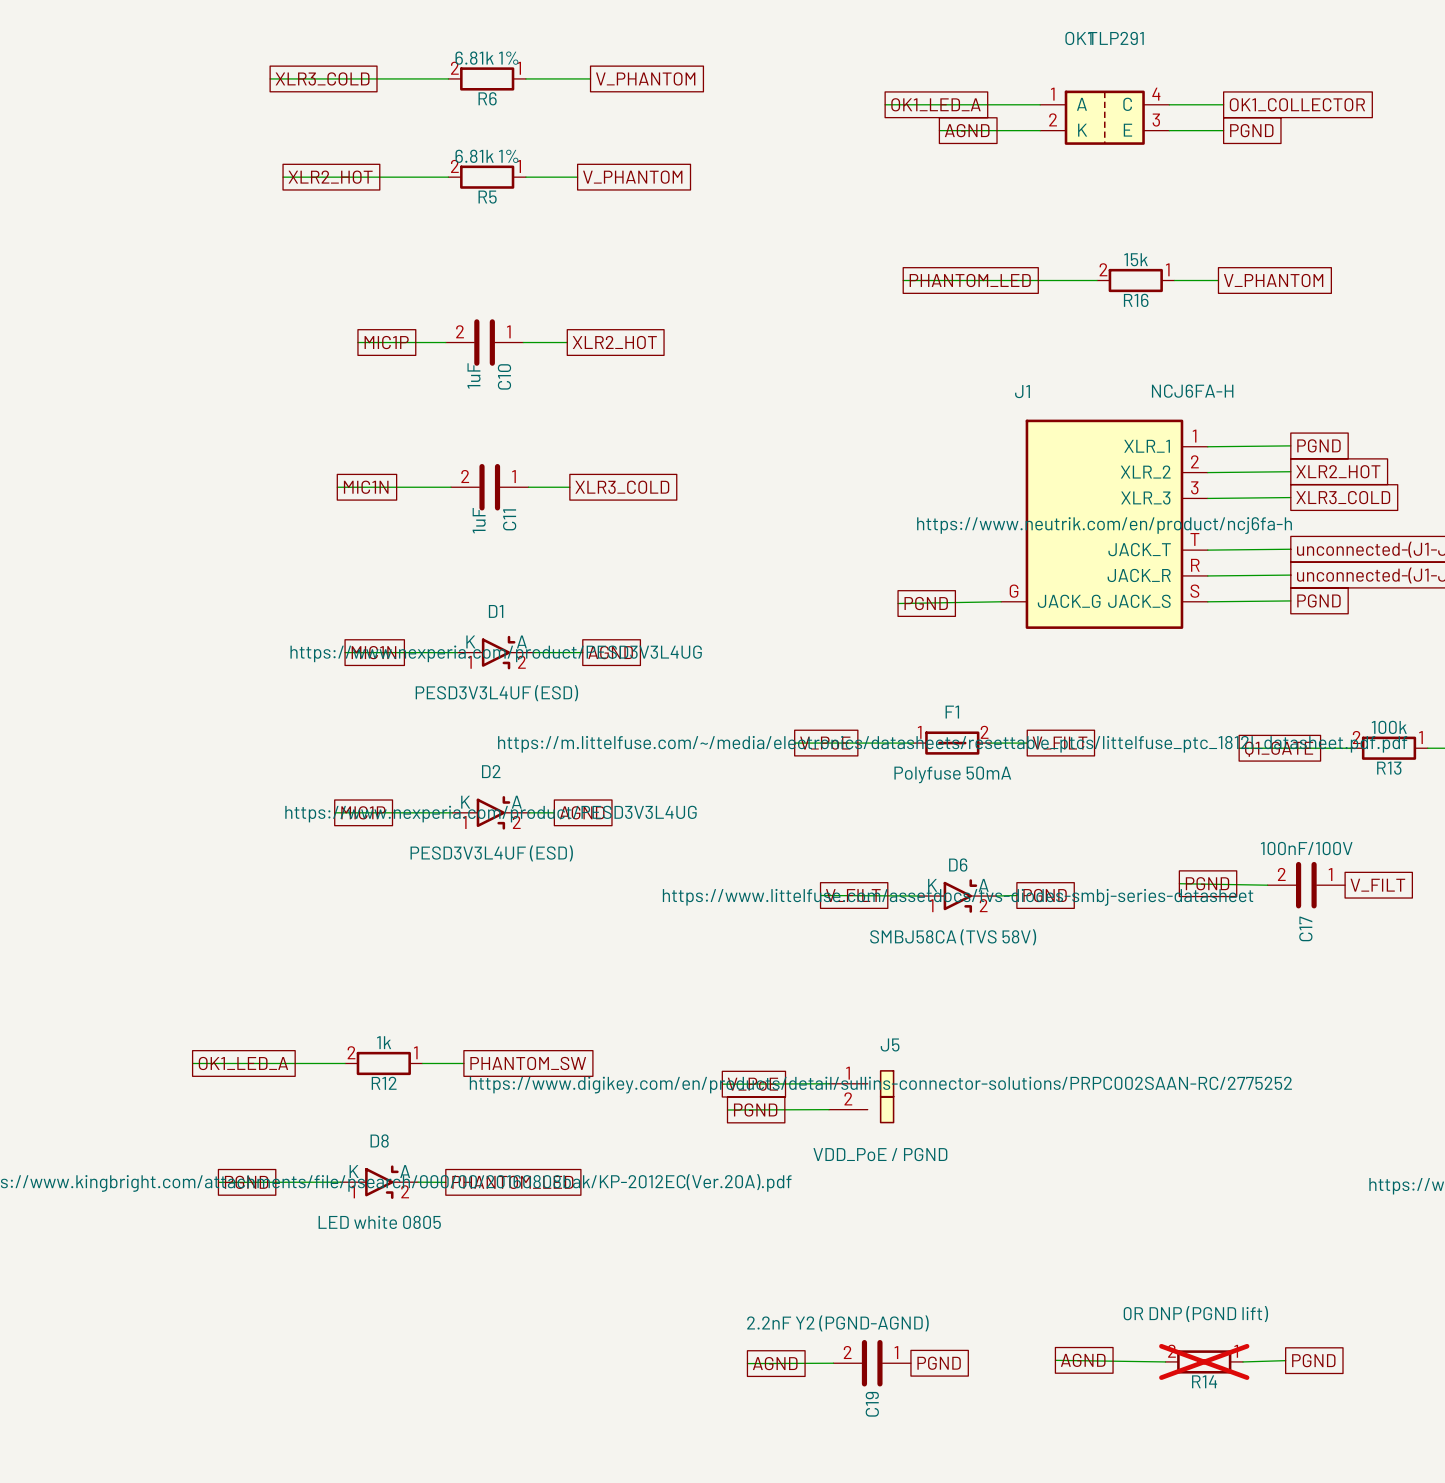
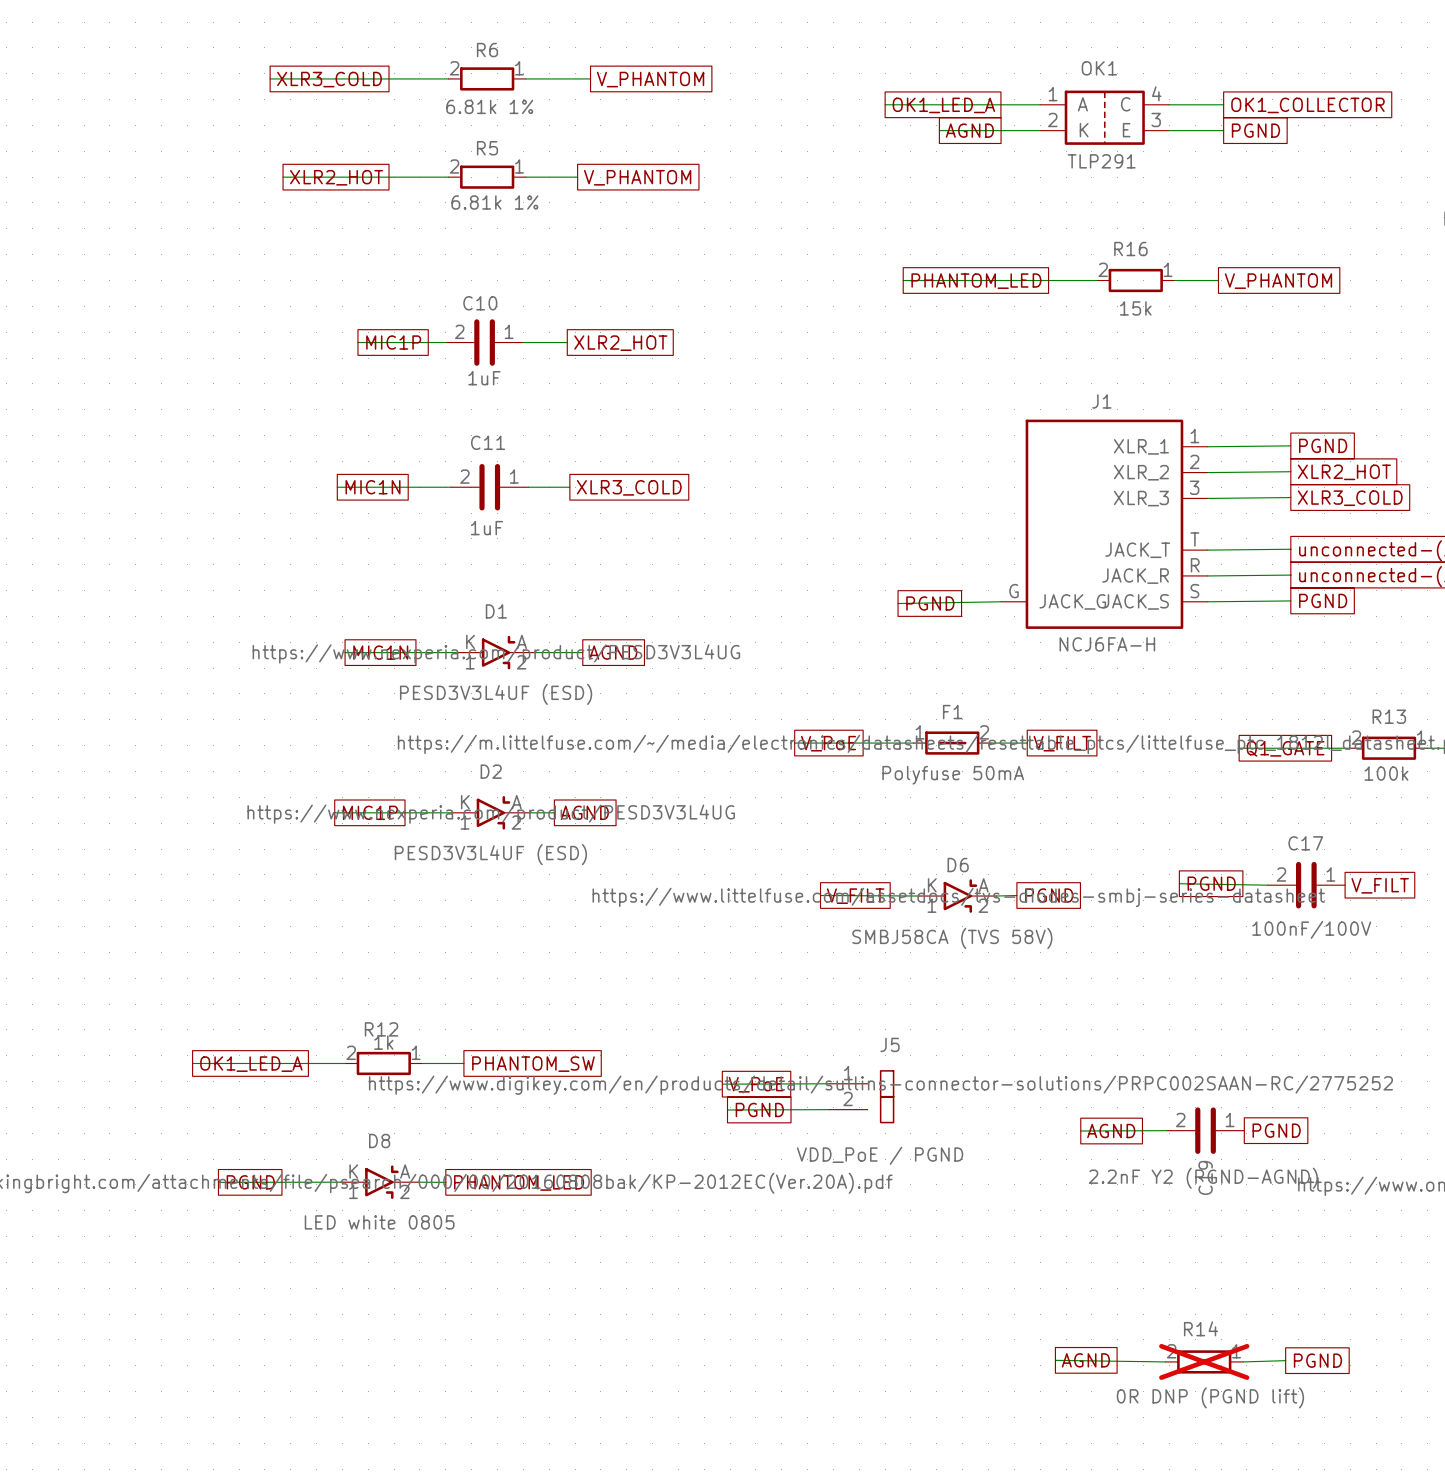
OK1 name position: OK1 (1078, 38) -> OK1 (1099, 68)
OK1 value position: TLP291 (1116, 38) -> TLP291 (1101, 161)
R6 value position: 6.81k 1% (486, 58) -> 6.81k 1% (489, 106)
R6 name position: R6 (487, 98) -> R6 (487, 50)
R5 value position: 6.81k 1% (486, 156) -> 6.81k 1% (494, 202)
R5 name position: R5 (487, 197) -> R5 (487, 148)
R16 value position: 15k (1136, 259) -> 15k (1135, 308)
R16 name position: R16 (1136, 300) -> R16 (1130, 249)
C10 value rotation: 0° (474, 375) -> 90° clockwise (484, 378)
C10 name rotation: 0° (504, 376) -> 90° clockwise (480, 303)
C10 name position: C10 (504, 376) -> C10 (480, 303)
J1 name position: J1 (1022, 391) -> J1 (1101, 401)
J1 value position: NCJ6FA-H (1192, 391) -> NCJ6FA-H (1107, 644)
C11 name rotation: 0° (509, 519) -> 90° clockwise (488, 442)
C11 name position: C11 (509, 519) -> C11 (488, 442)
C11 value rotation: 0° (479, 520) -> 90° clockwise (487, 528)
J1 text: https://www.neutrik.com/en/product/ncj6fa-h (1104, 525) -> none
R13 value position: 100k (1389, 727) -> 100k (1386, 773)
R13 name position: R13 (1389, 768) -> R13 (1389, 716)
C17 value position: 100nF/100V (1306, 848) -> 100nF/100V (1311, 929)
C17 name rotation: 0° (1305, 928) -> 90° clockwise (1305, 843)
C17 name position: C17 (1305, 928) -> C17 (1305, 843)
R12 name position: R12 (384, 1083) -> R12 (381, 1029)
wire: none -> (1166, 1130) (1080, 1131)
global label: none -> PGND (1276, 1130)
global label: none -> AGND (1111, 1131)
R14 value position: 0R DNP (PGND lift) (1195, 1314) -> 0R DNP (PGND lift) (1210, 1397)
C19 value position: 2.2nF Y2 (PGND-AGND) (837, 1323) -> 2.2nF Y2 (PGND-AGND) (1203, 1178)
global label: AGND (775, 1363) -> none
wire: (833, 1363) (747, 1363) -> none
C19 position: (872, 1363) -> (1205, 1130)
global label: PGND (939, 1363) -> none
R14 name position: R14 (1204, 1381) -> R14 (1200, 1328)

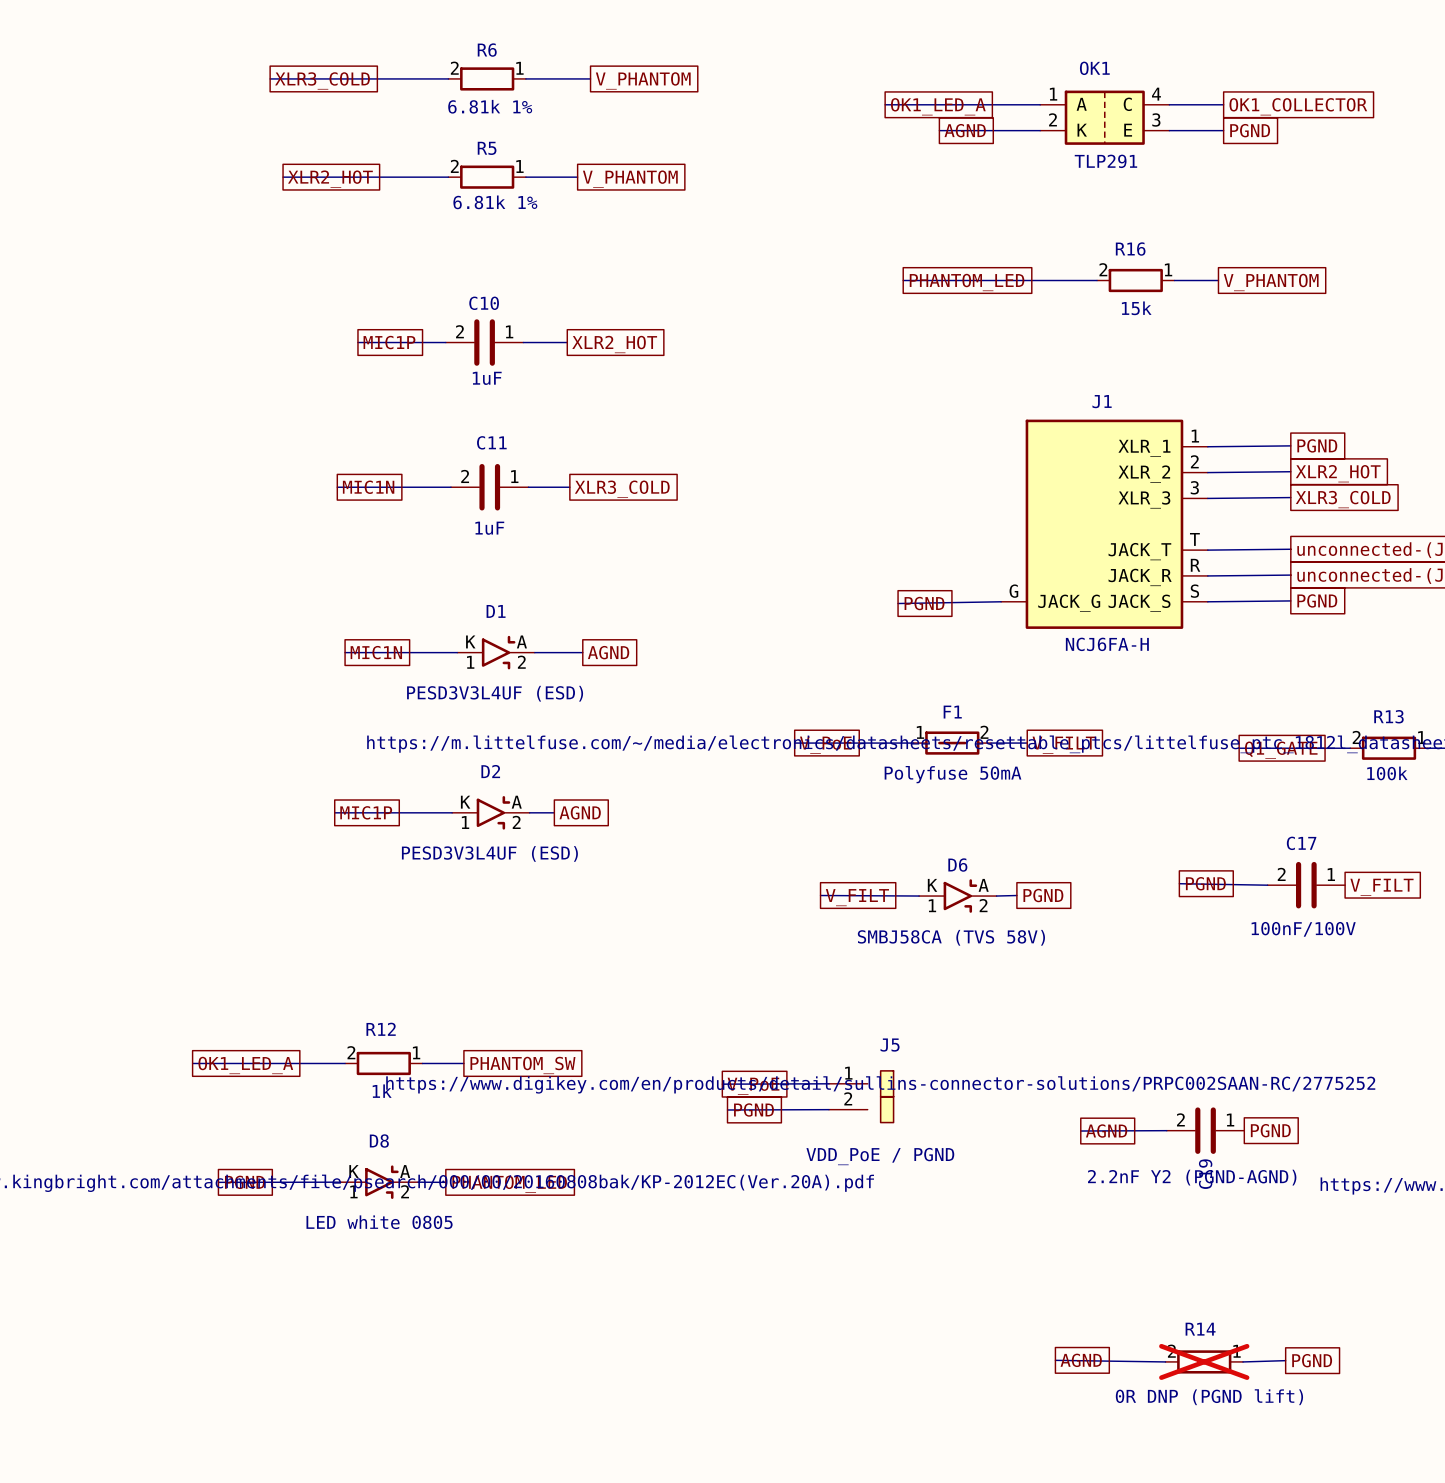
D1 text: https://www.nexperia.com/product/PESD3V3L4UG (496, 653) -> none
D2 text: https://www.nexperia.com/product/PESD3V3L4UG (491, 814) -> none
D6 text: https://www.littelfuse.com/assetdocs/tvs-diodes-smbj-series-datasheet (958, 897) -> none
R12 value position: 1k (383, 1042) -> 1k (382, 1091)

